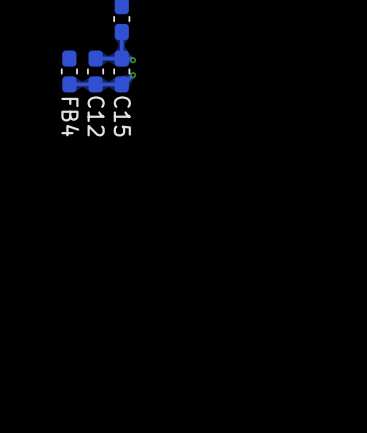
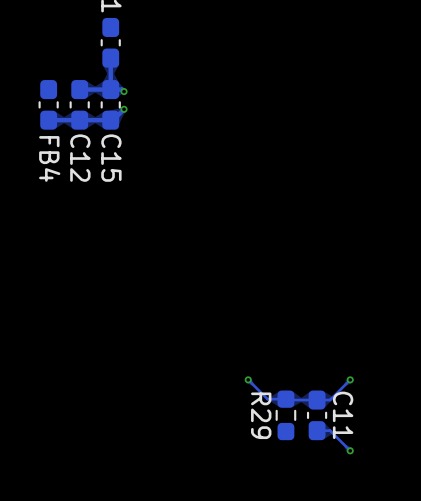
via: none -> (248, 379)
track: none -> (350, 379) (330, 400) (267, 399) (248, 379)
via: none -> (350, 379)
R29: none -> (285, 415)
C11: none -> (317, 415)
track: none -> (317, 430) (330, 430) (350, 450)
via: none -> (350, 450)

